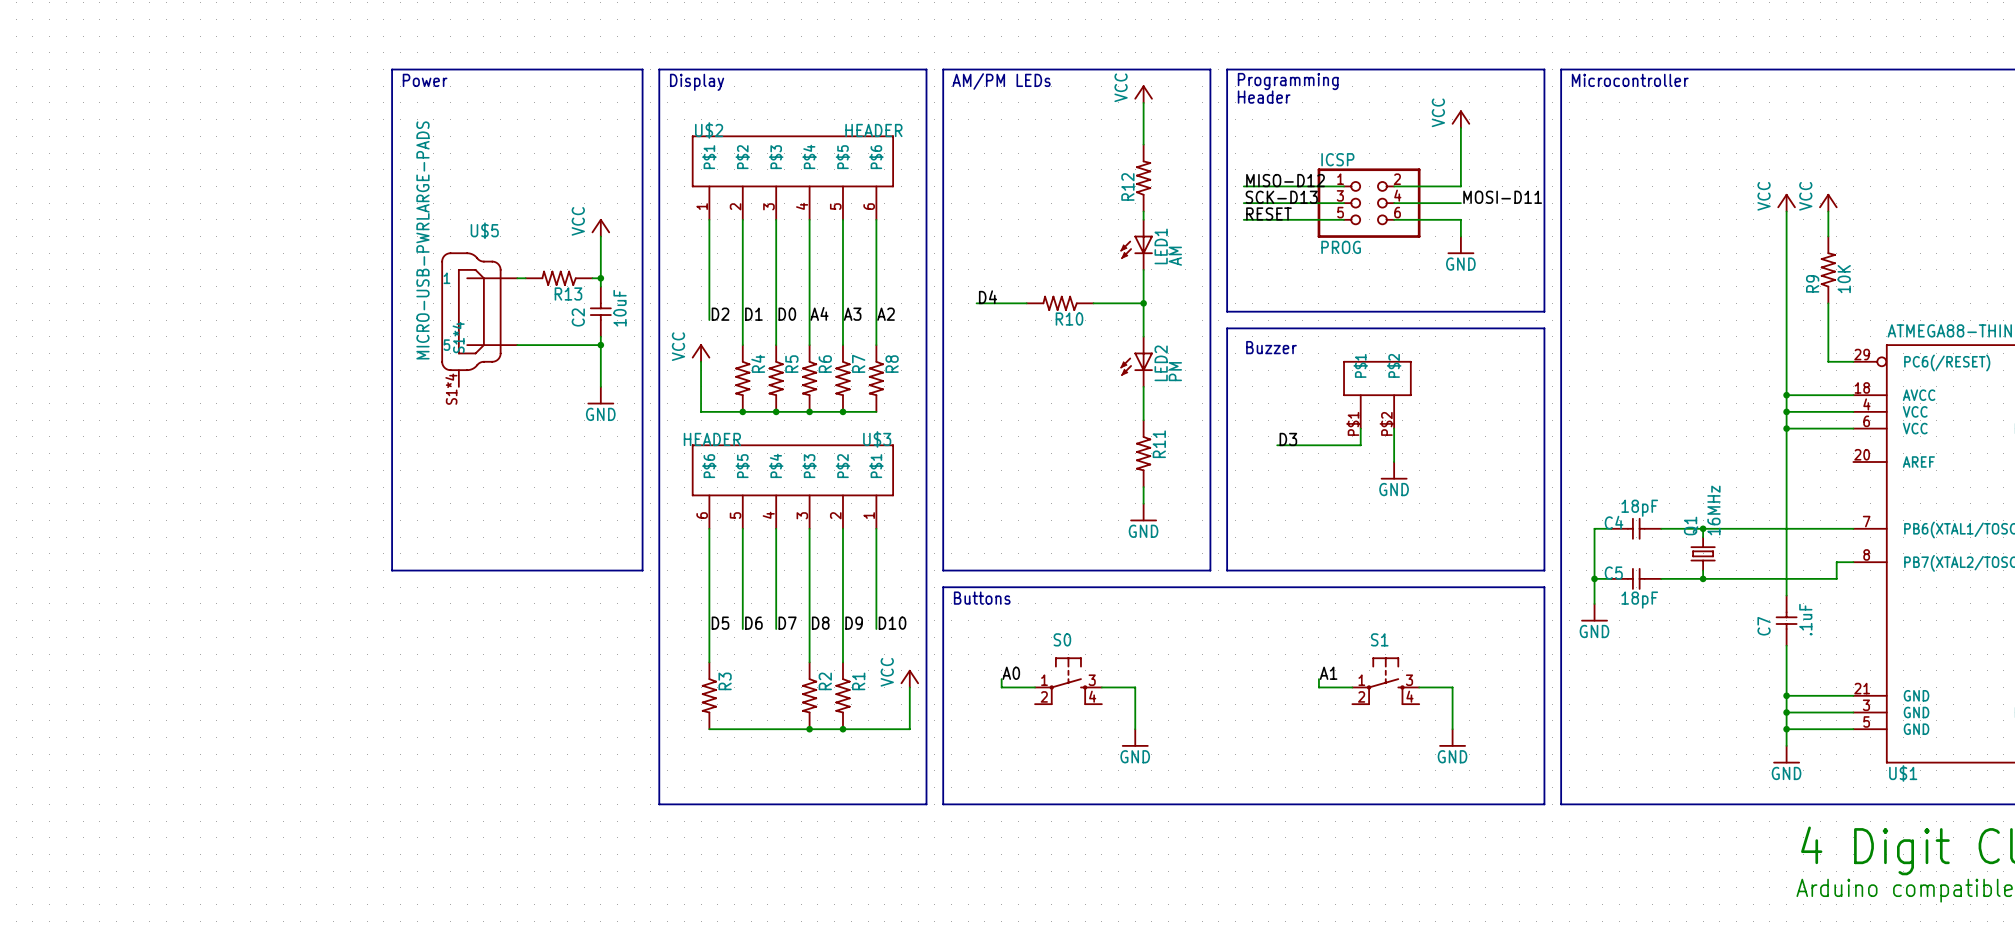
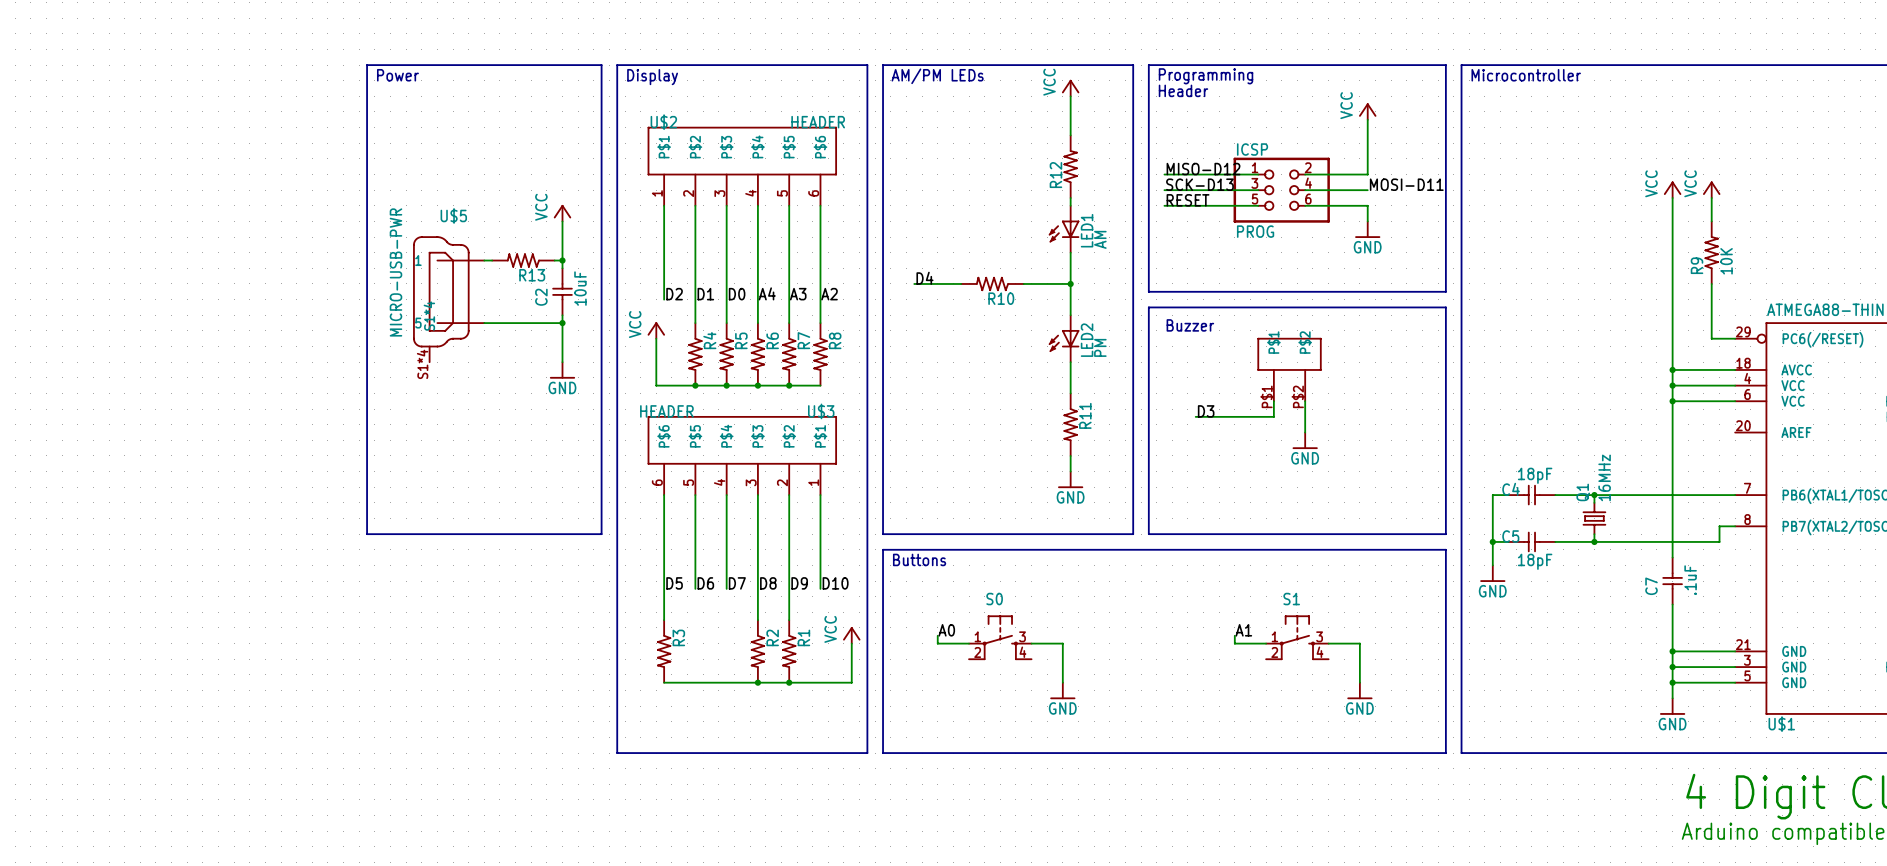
U$5 value: MICRO-USB-PWRLARGE-PADS (422, 240) -> MICRO-USB-PWR (395, 272)

